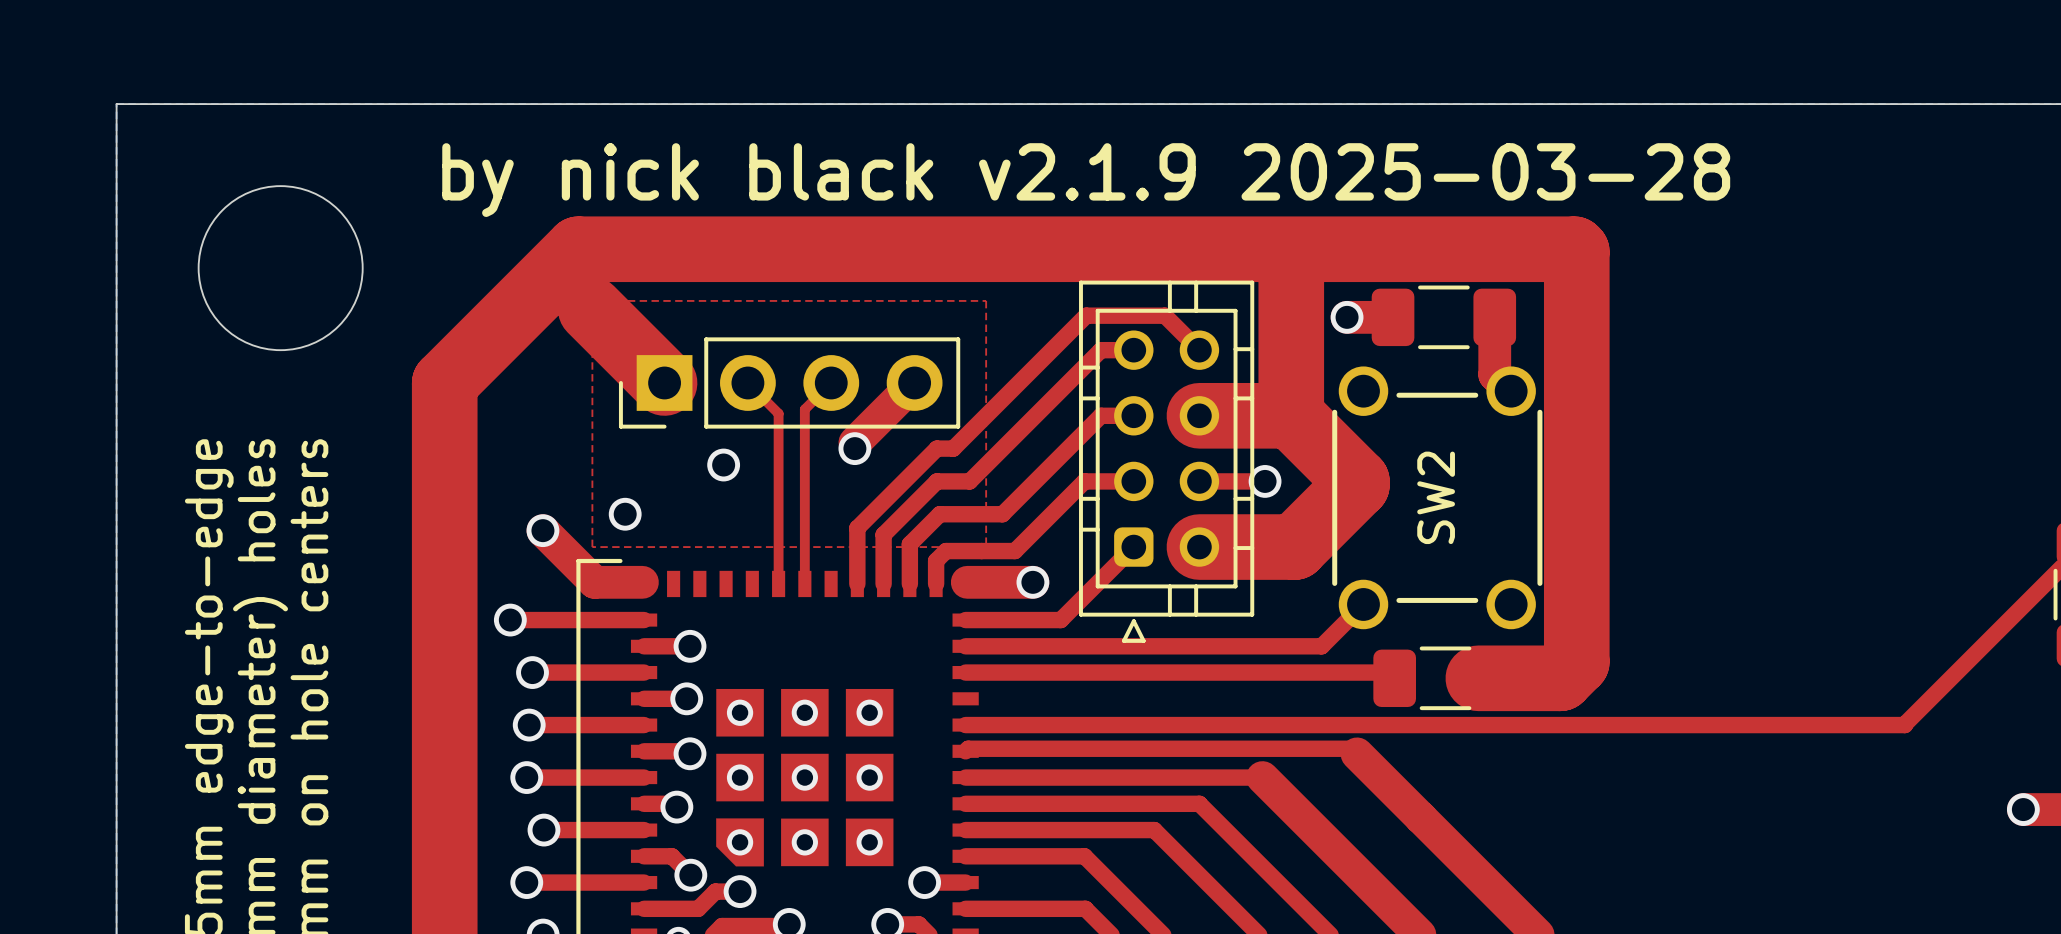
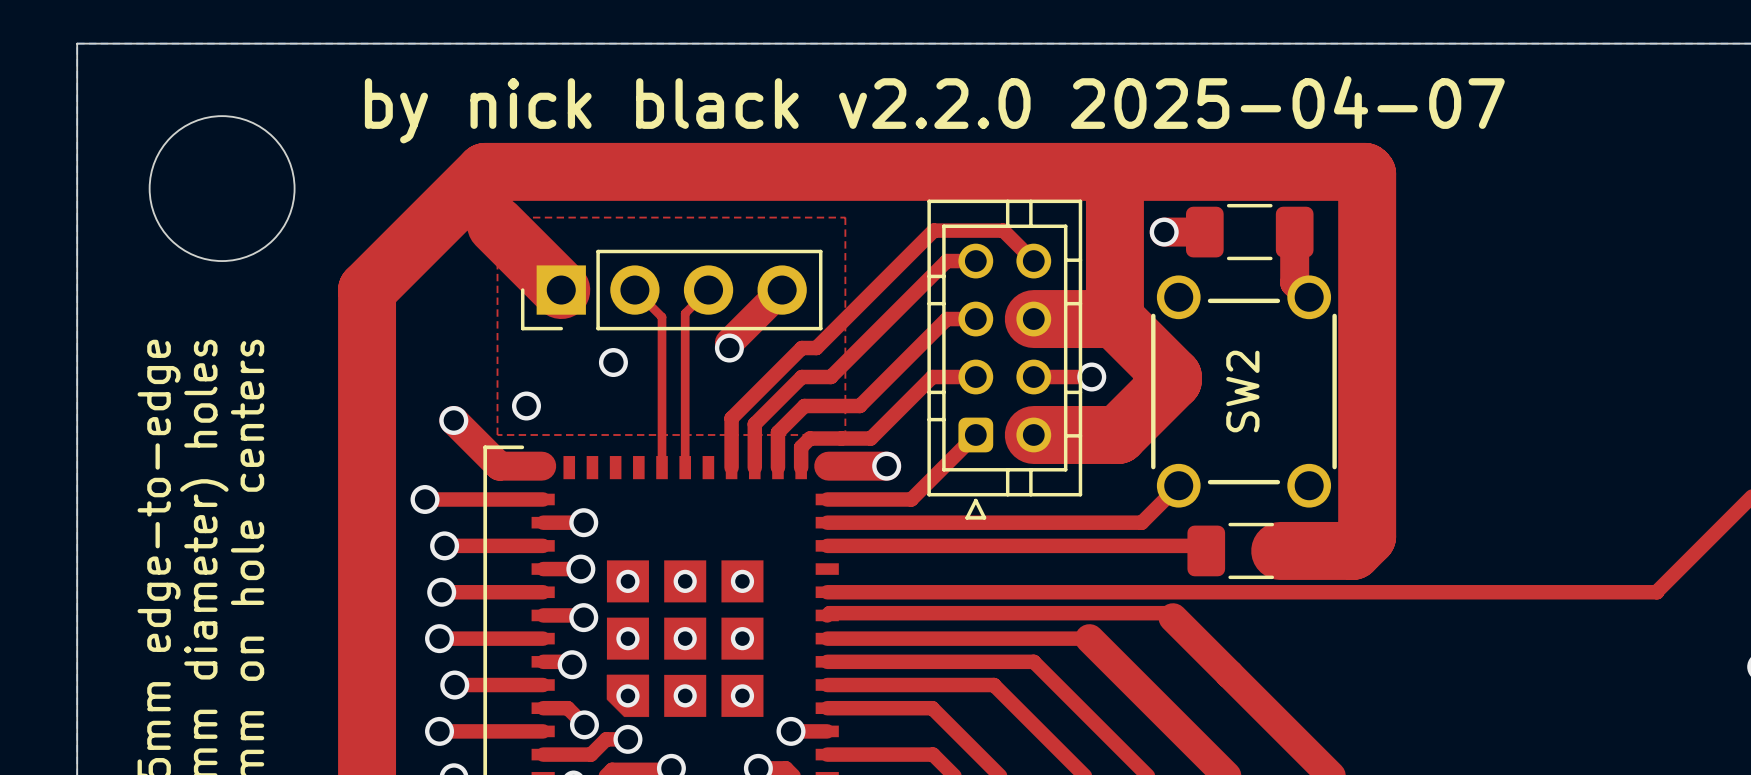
text: by nick black v2.1.9 2025-03-28 (1086, 180) -> by nick black v2.2.0 2025-04-07 (934, 109)

